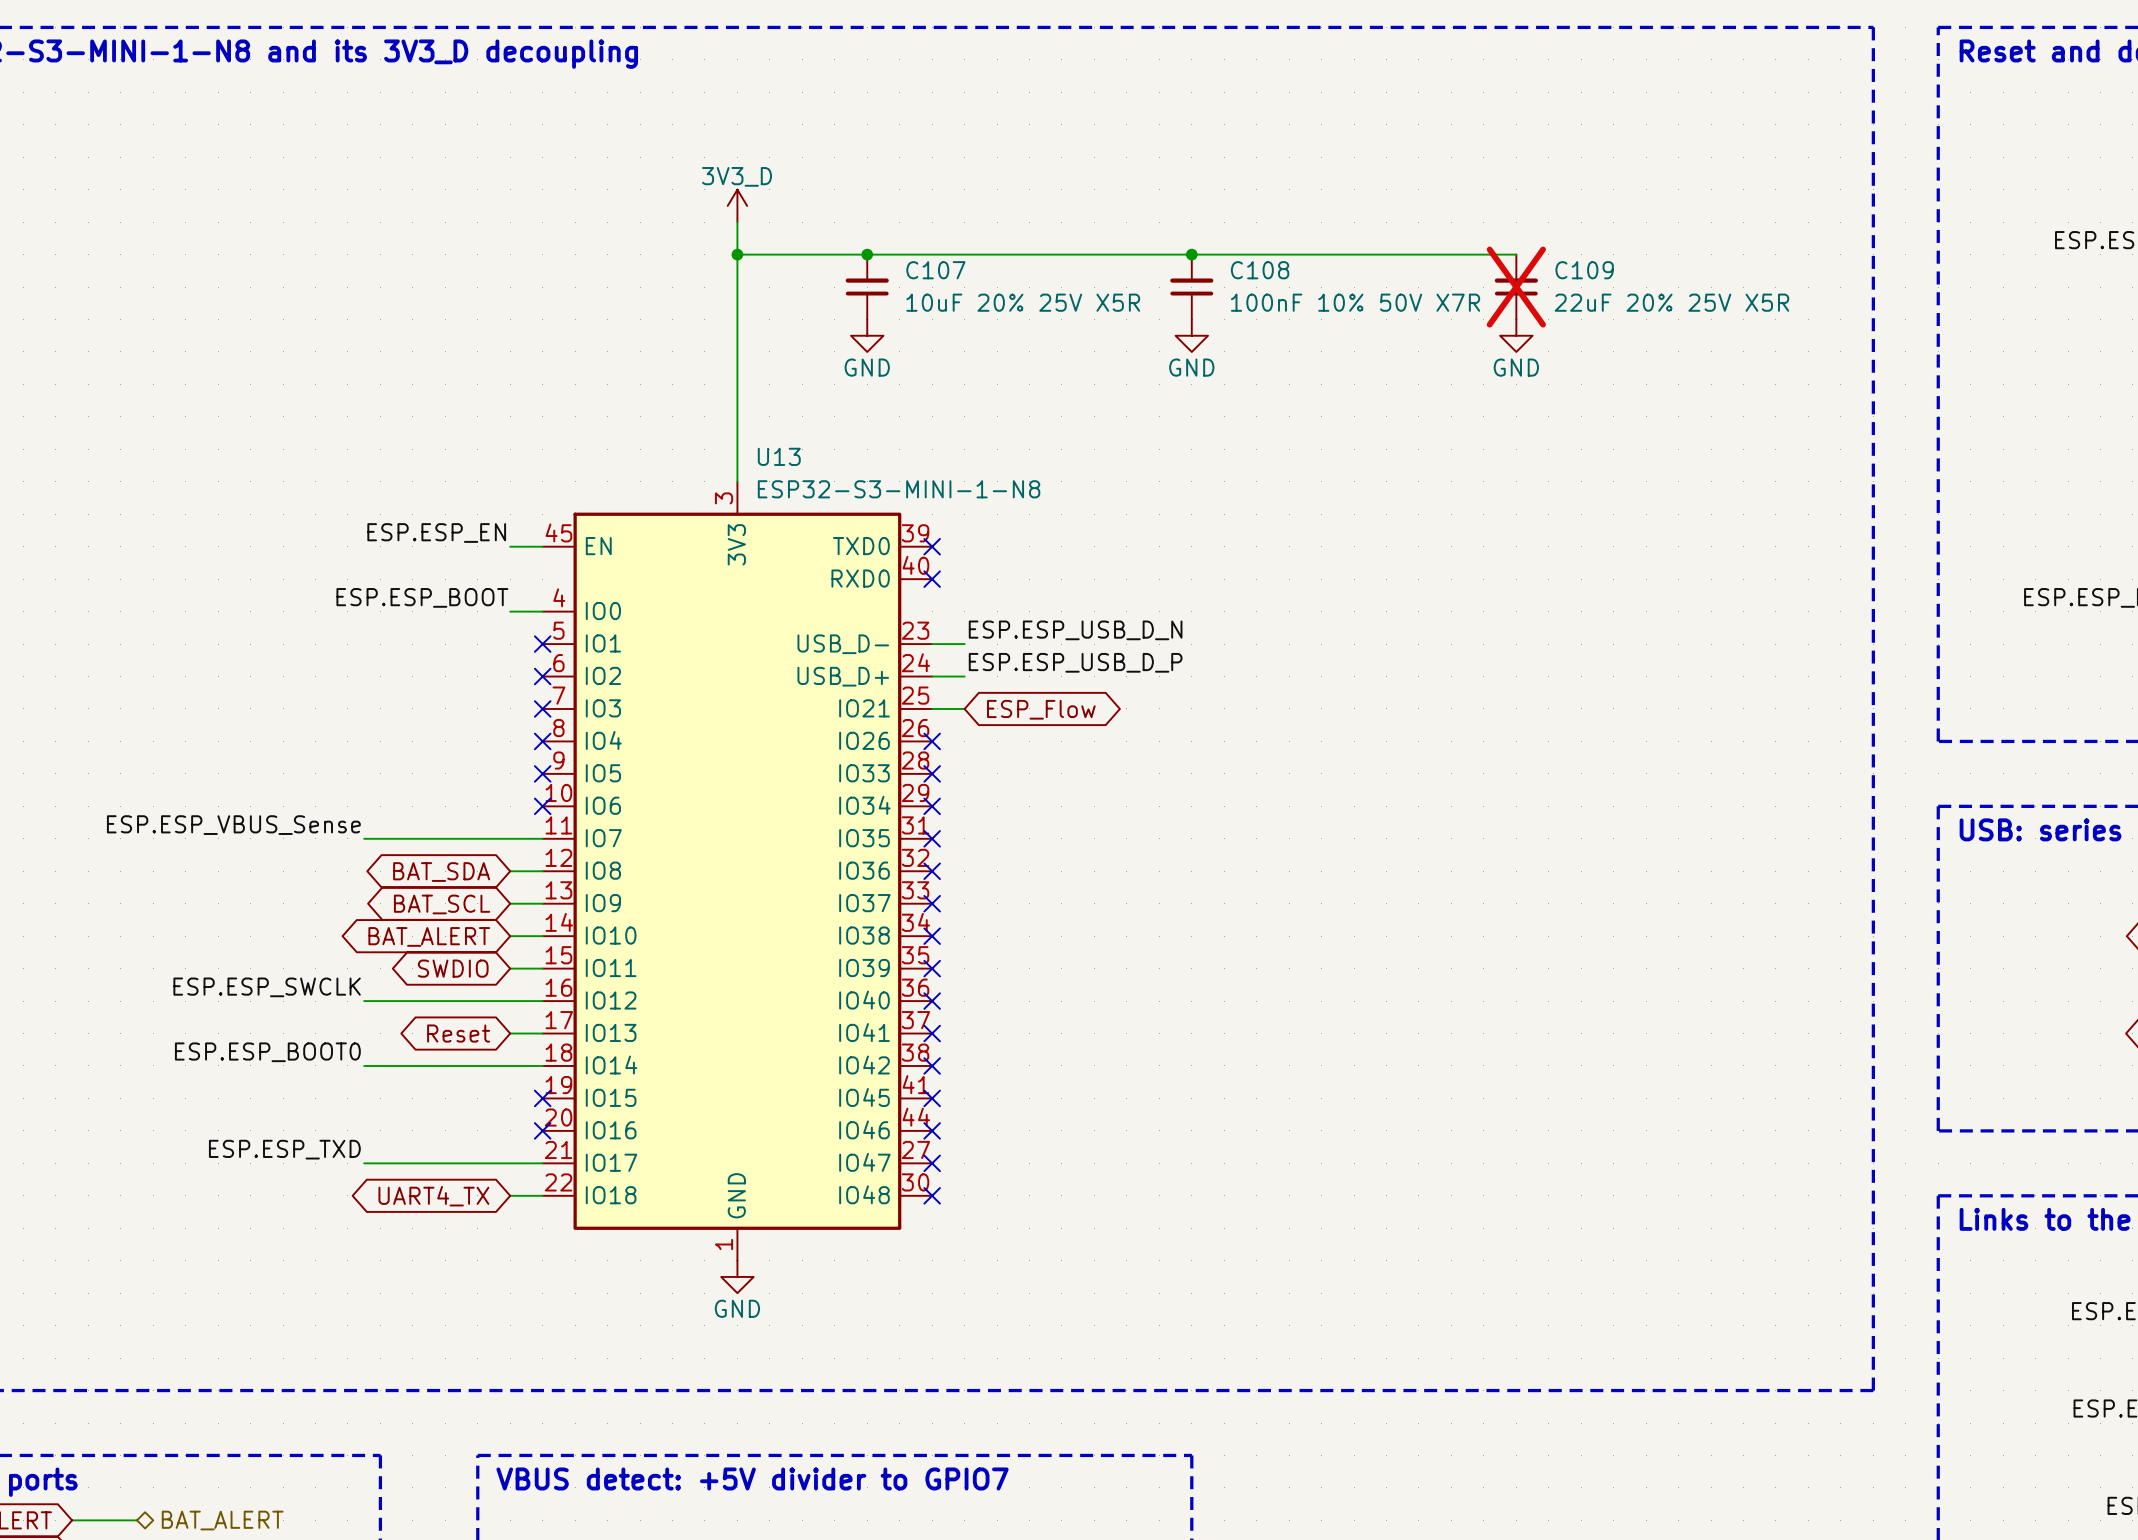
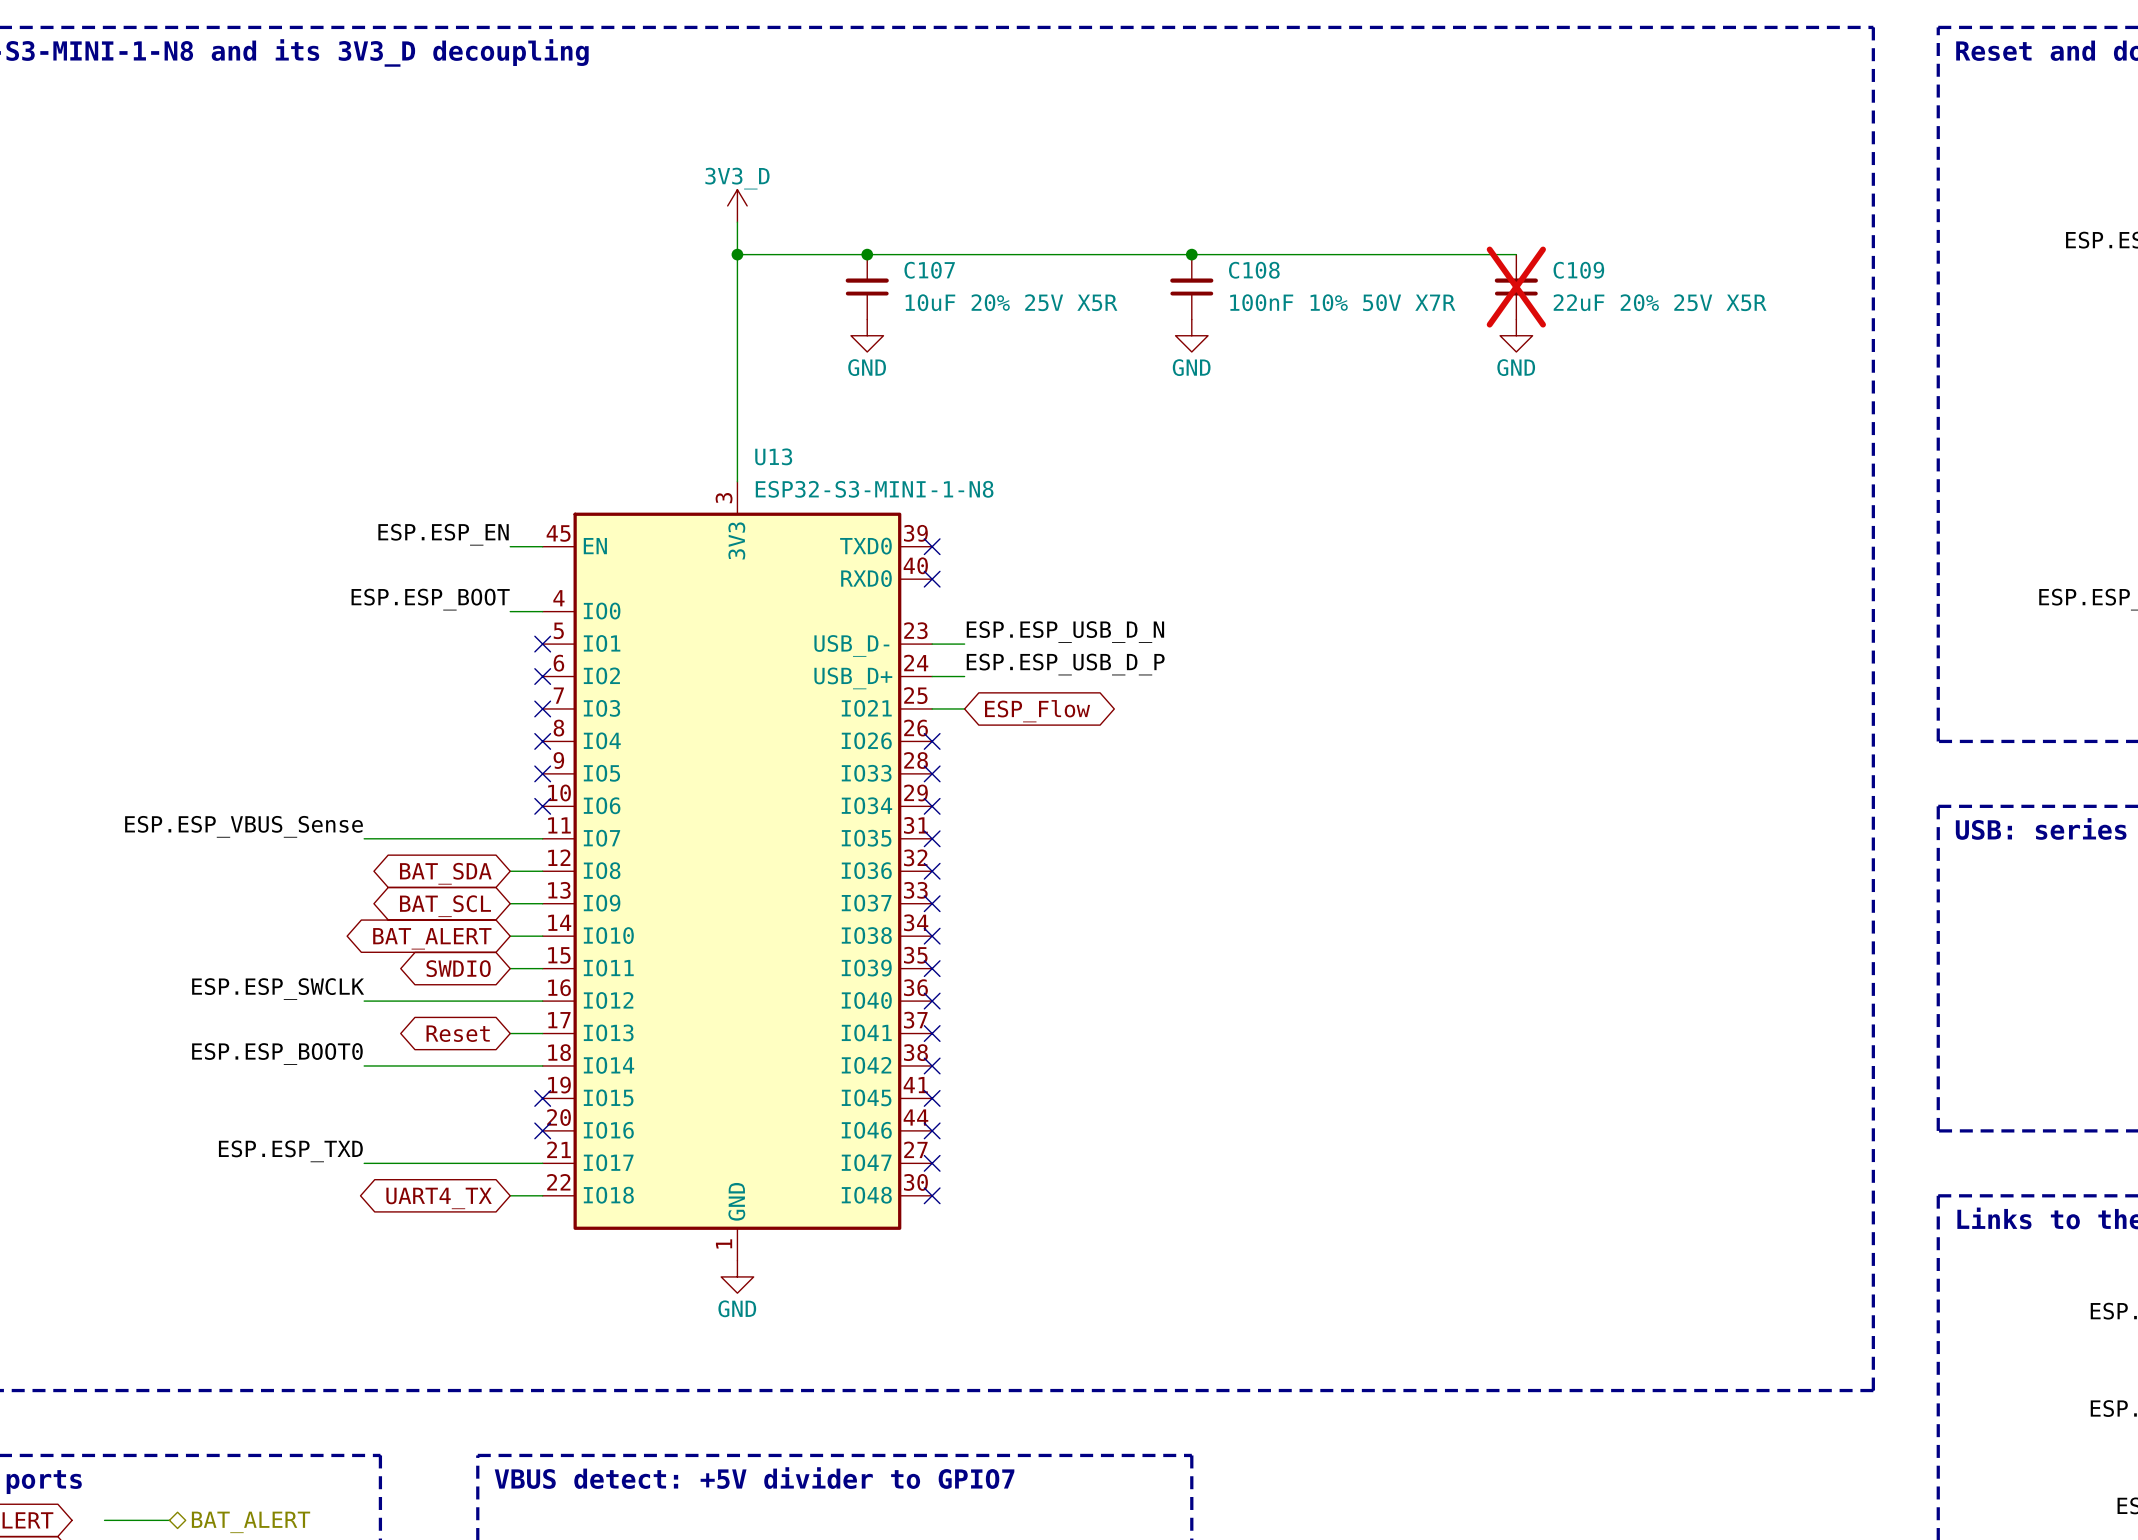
wire: (72, 1520) (104, 1520) -> (137, 1520) (169, 1520)
hierarchical label position: BAT_ALERT (222, 1520) -> BAT_ALERT (251, 1522)

